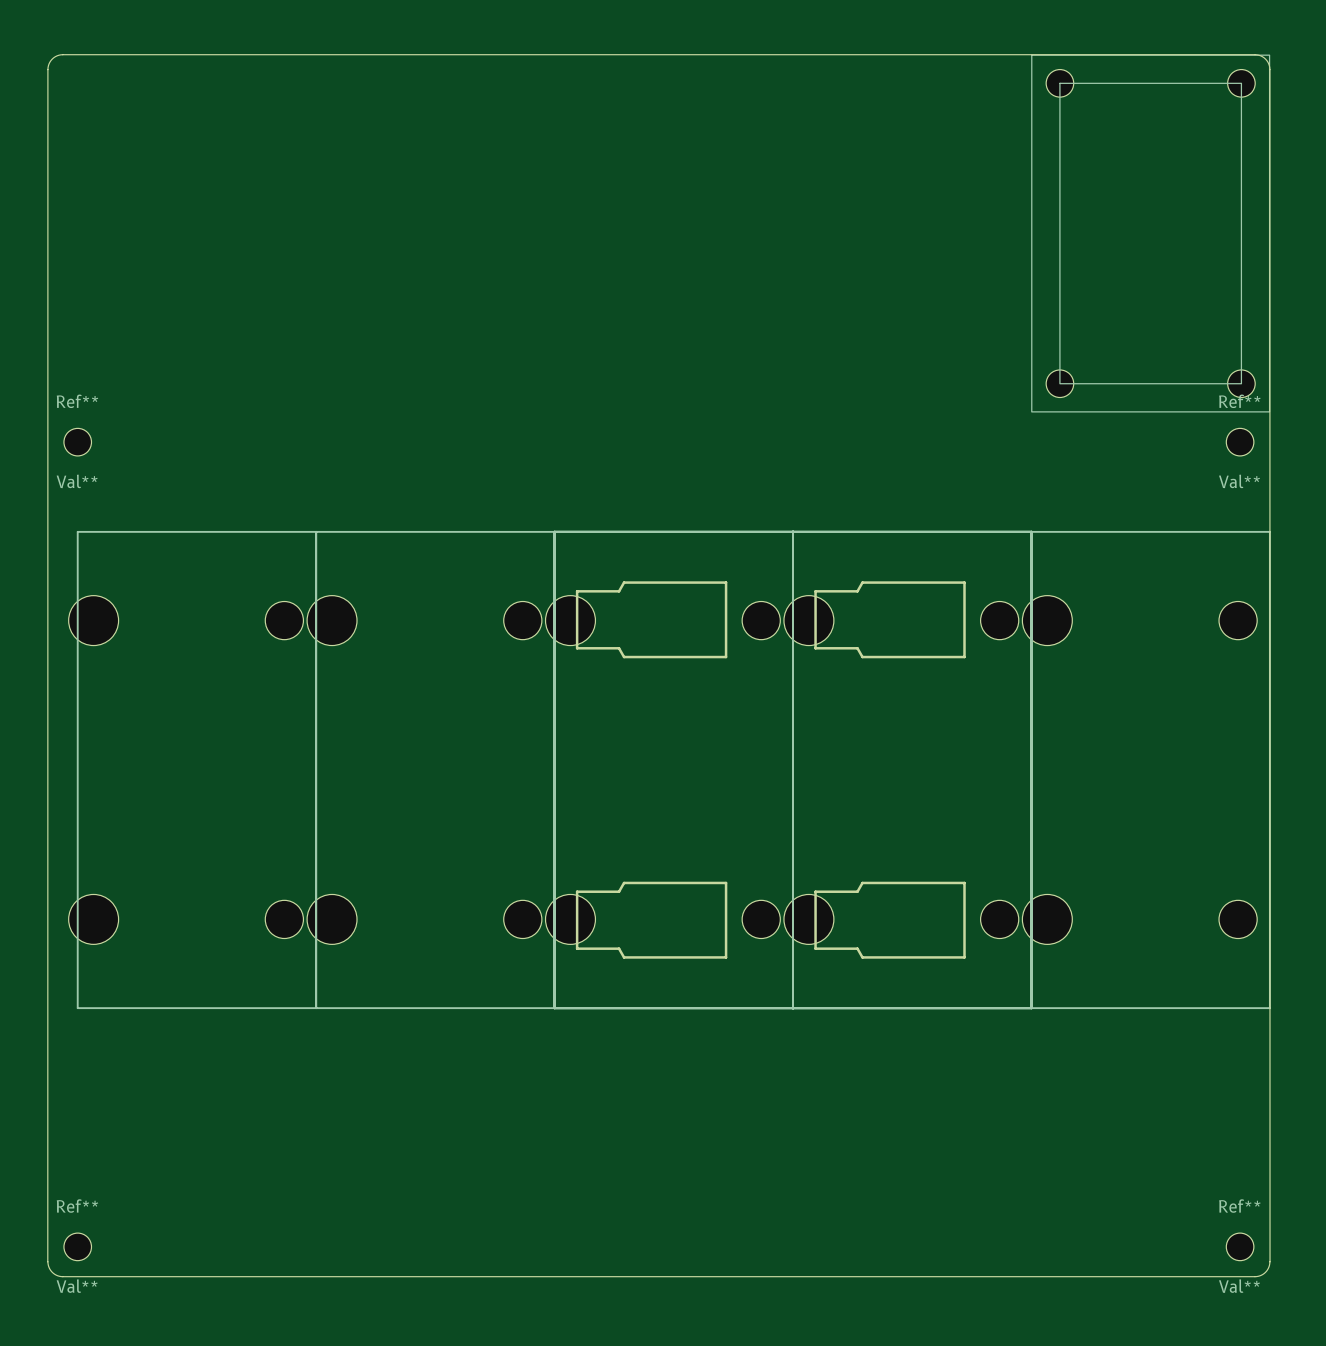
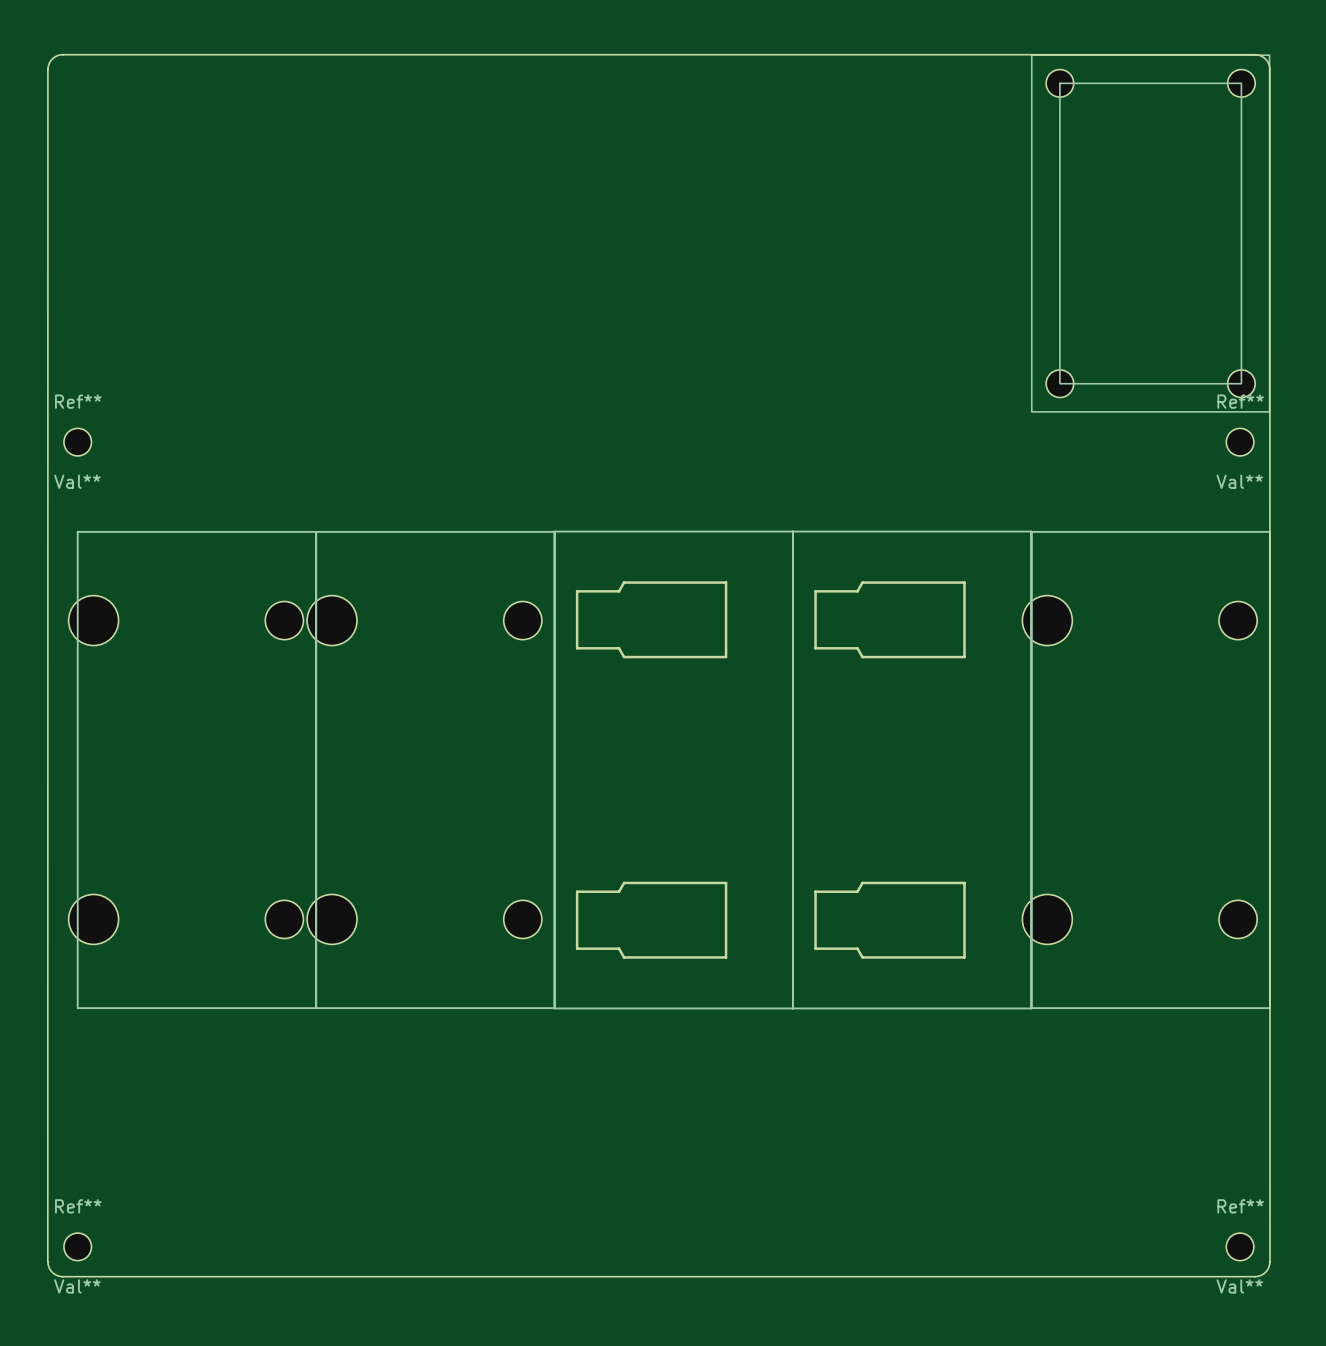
part: (669, 770) -> none
part: (908, 770) -> none

